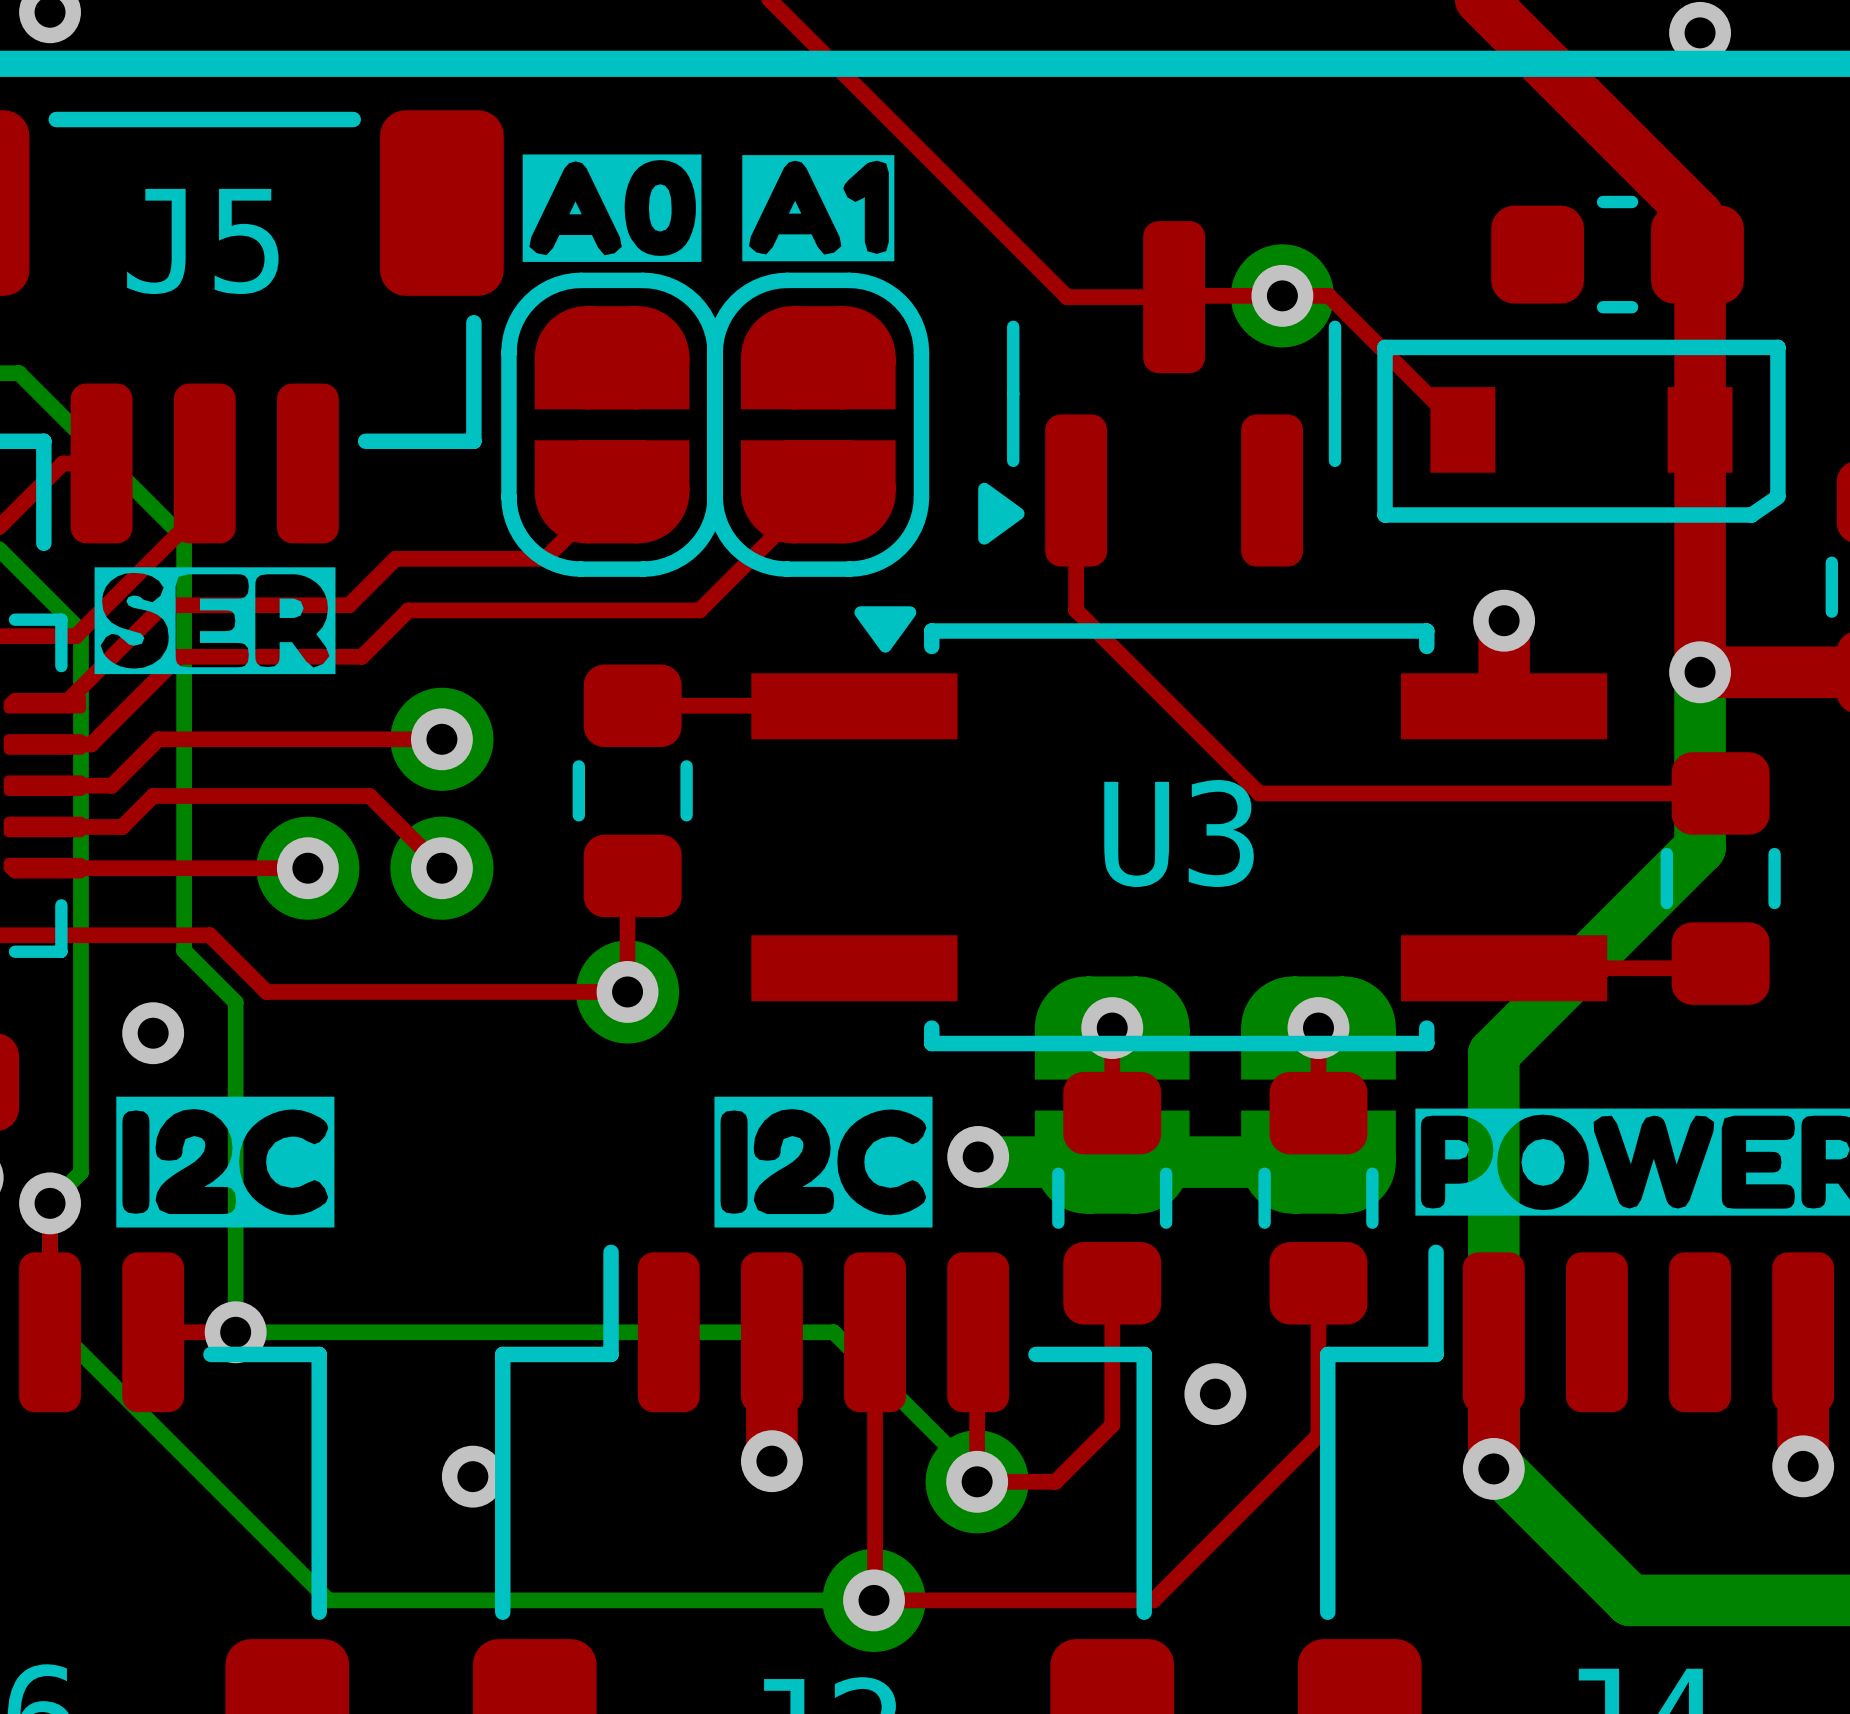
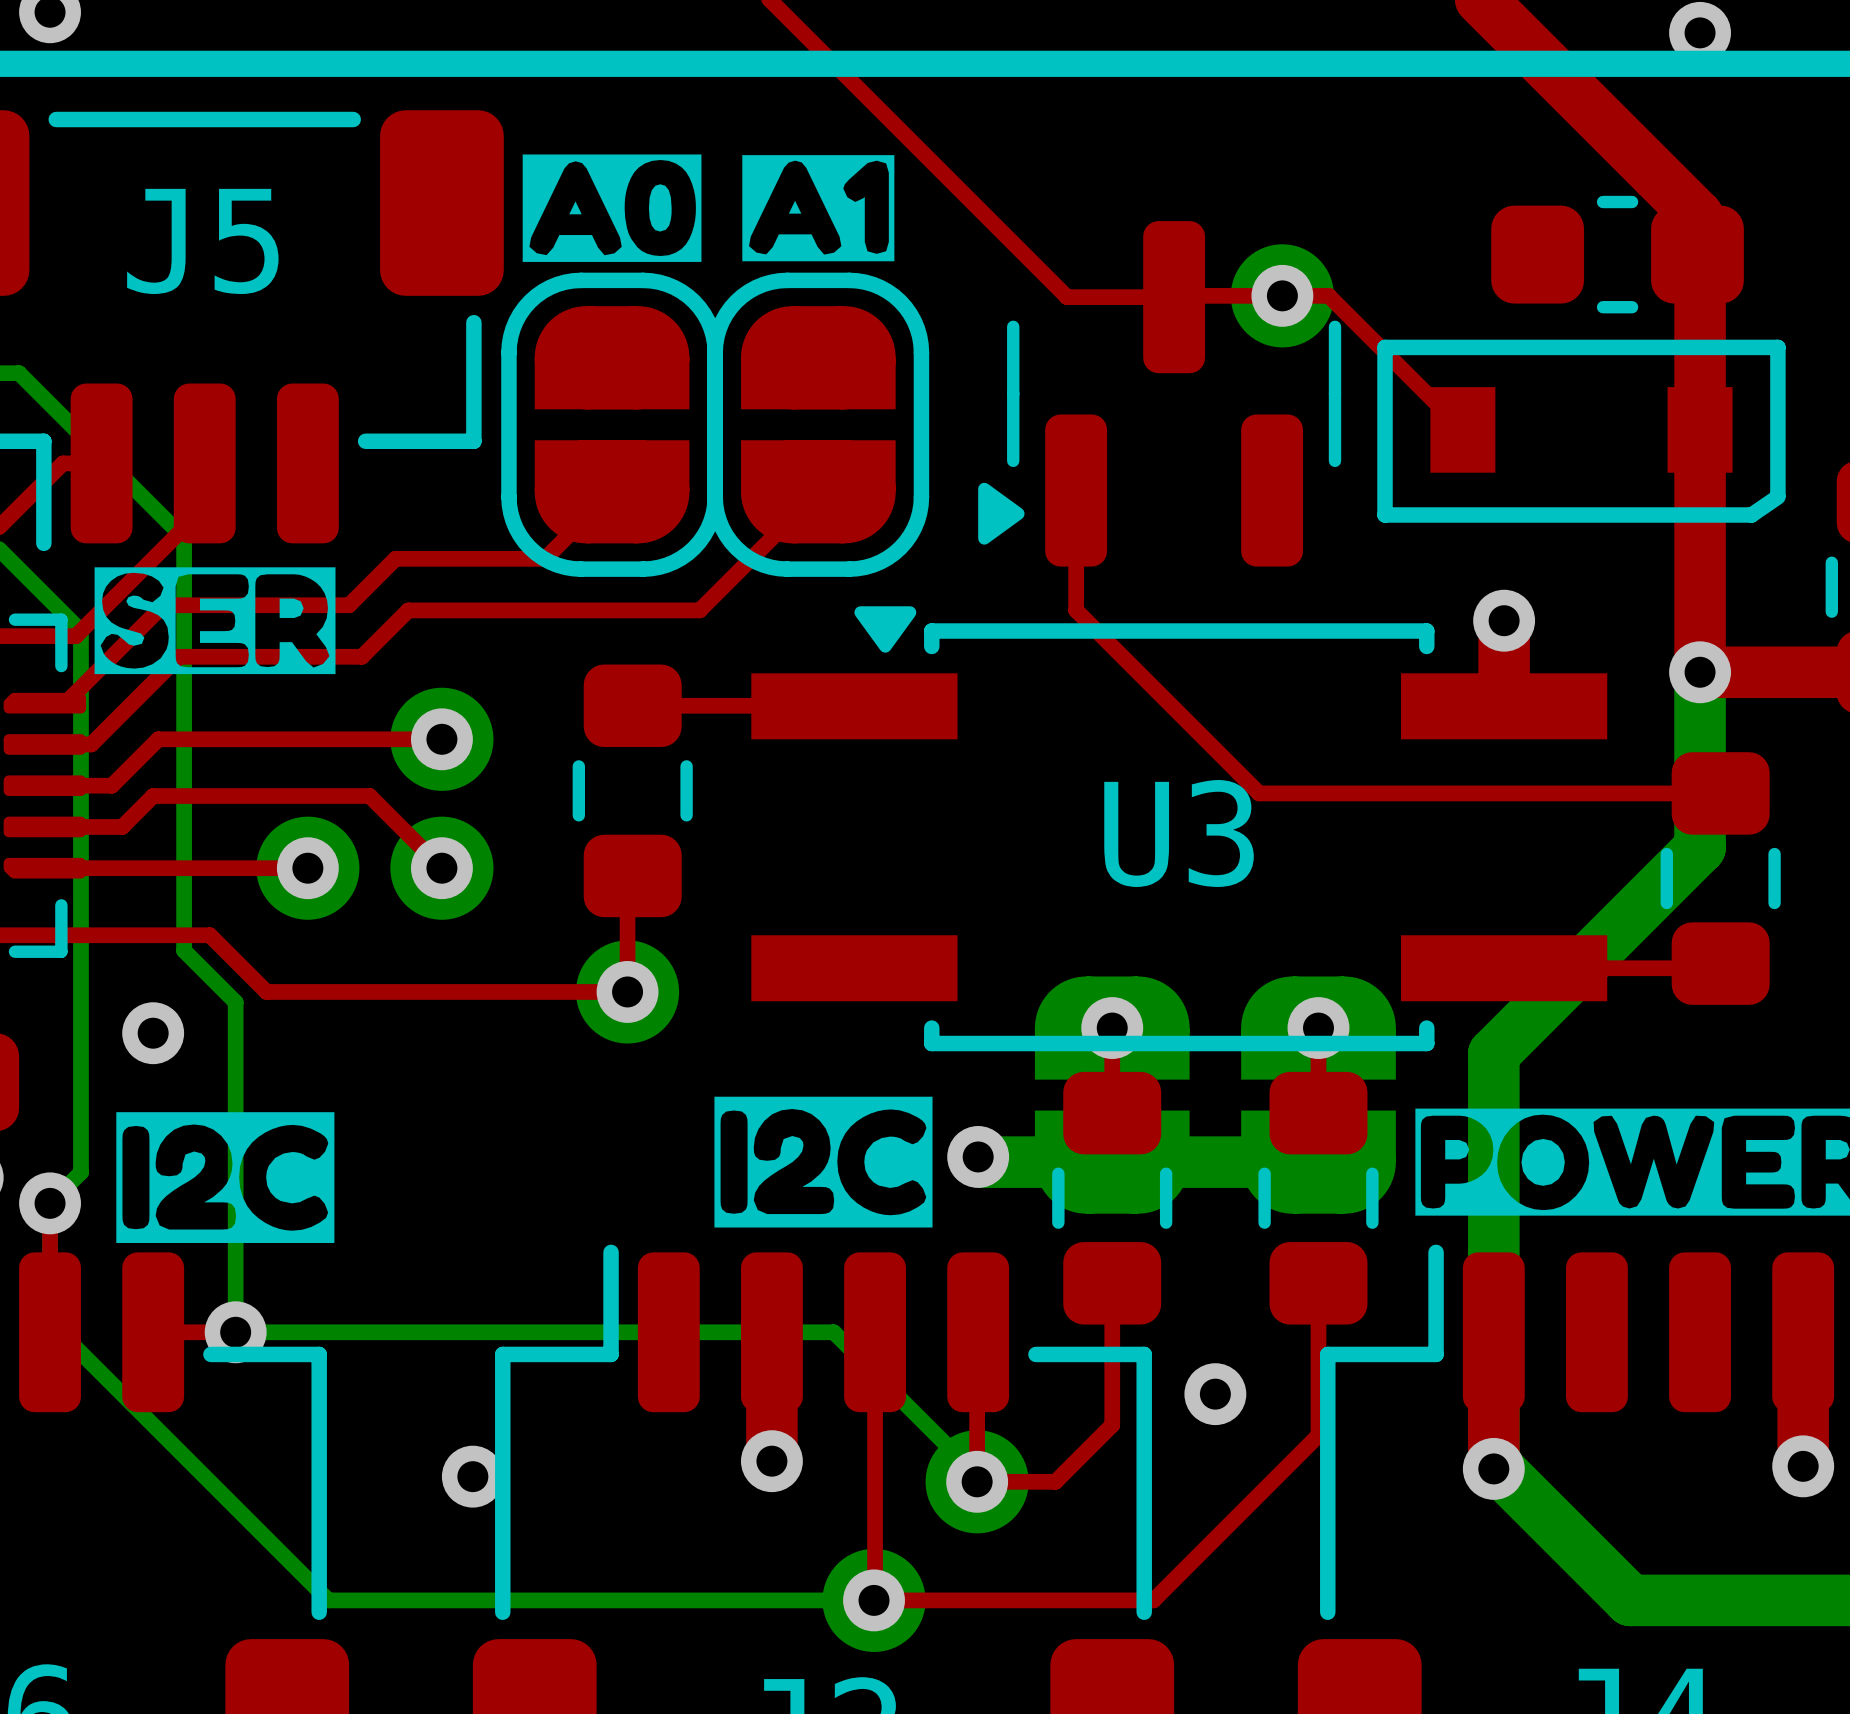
drawing position: (225, 1162) -> (225, 1177)

